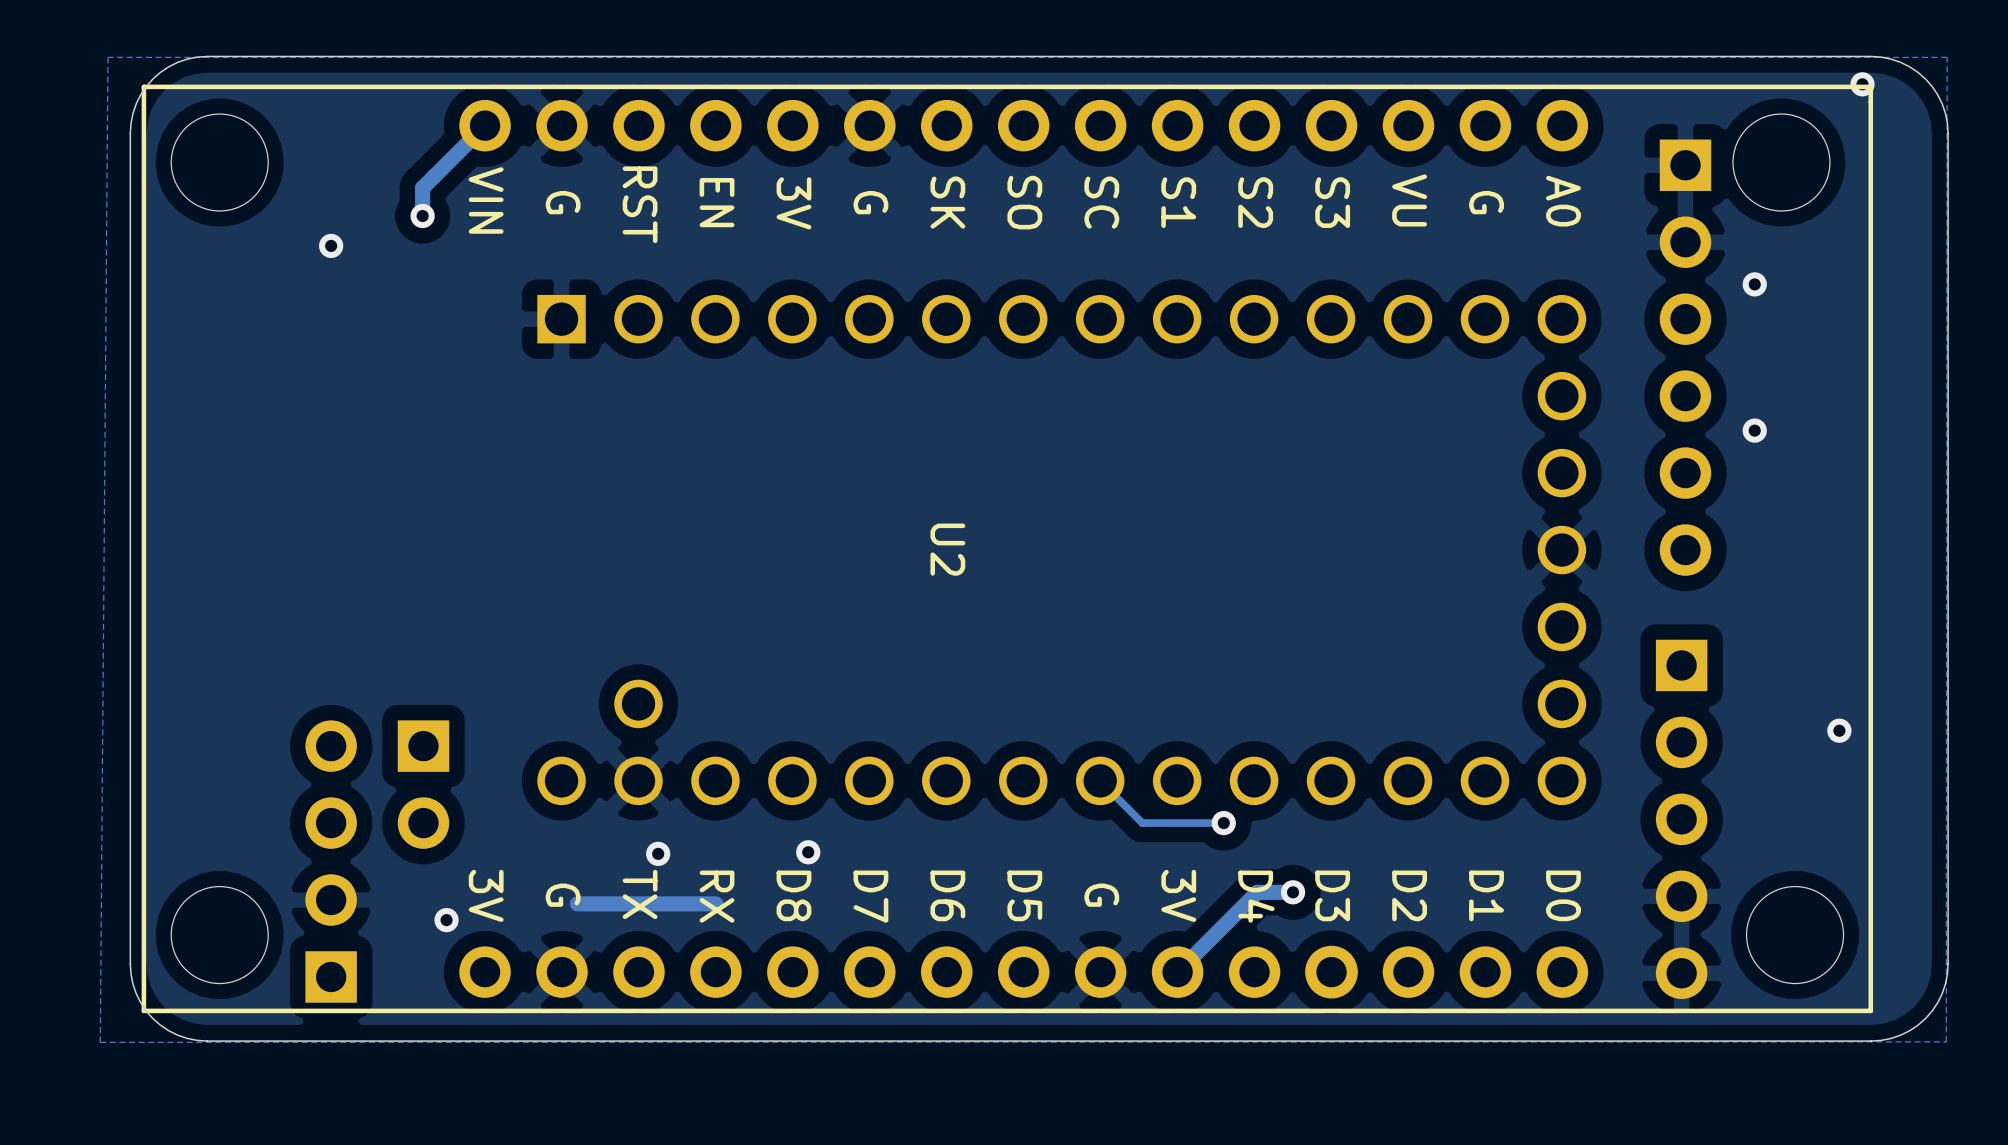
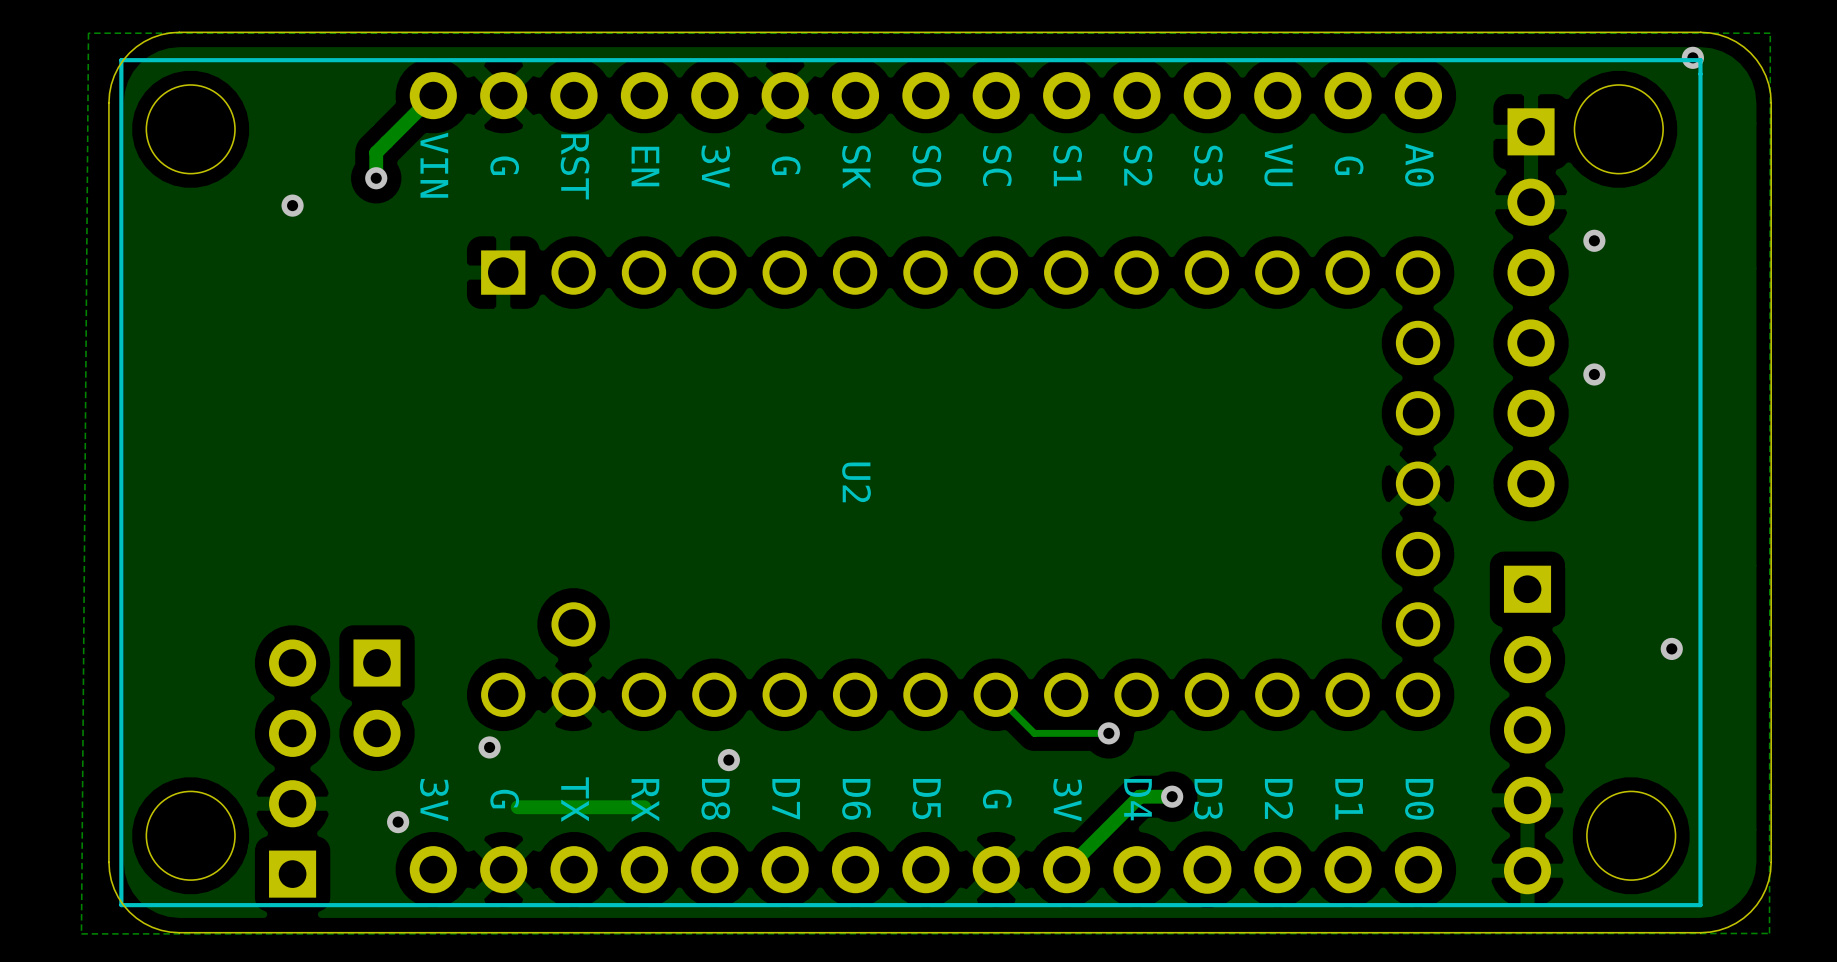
via position: (658, 853) -> (489, 747)

